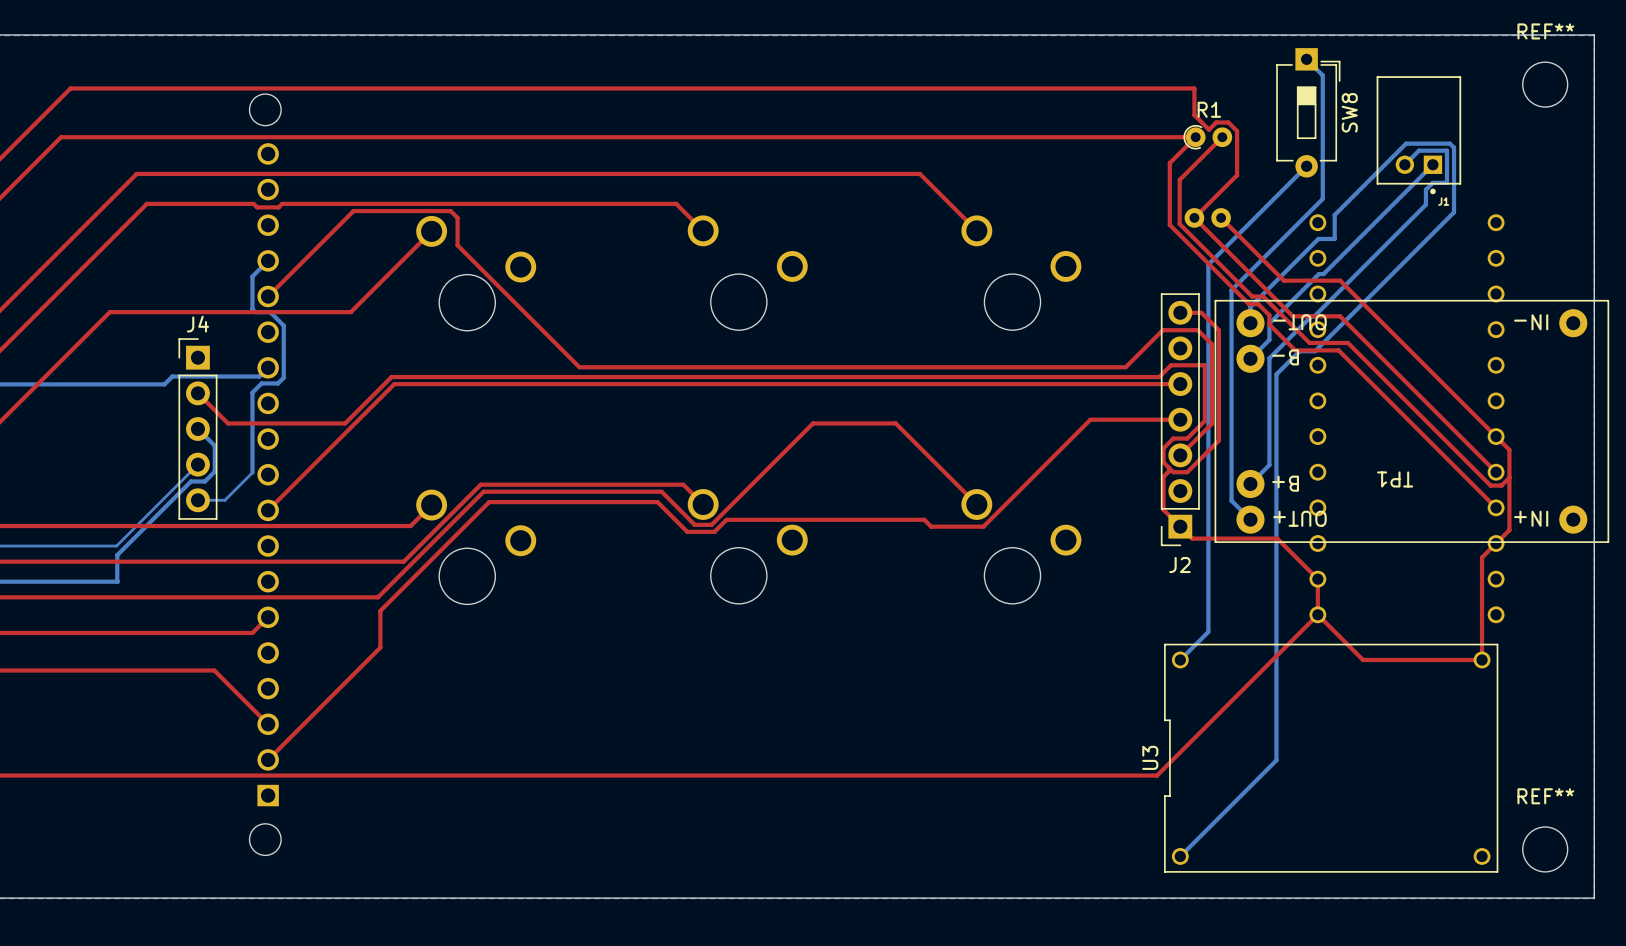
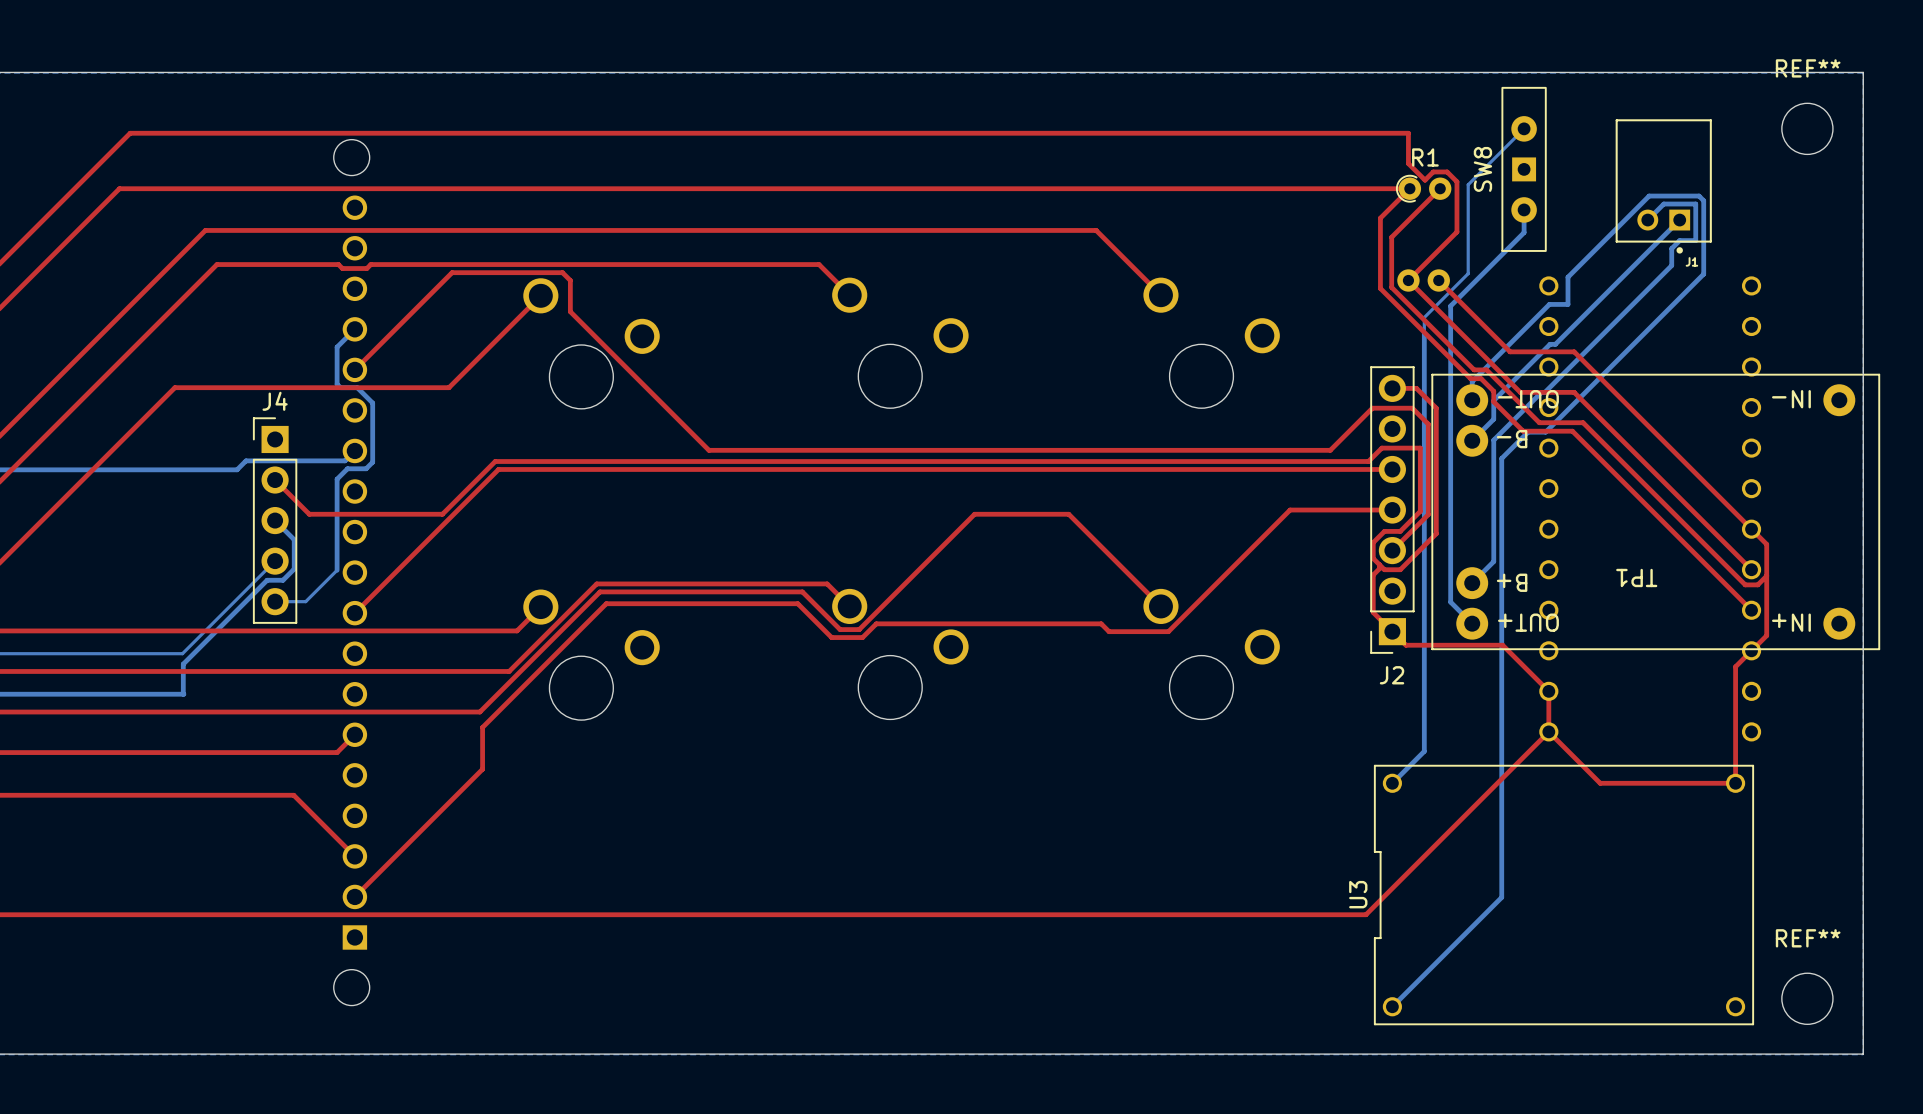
SW8 footprint: [1276, 48, 1341, 178] -> [1501, 86, 1547, 252]
bottom track: (1306, 59) (1322, 75) (1322, 198) (1231, 290) -> (1524, 209) (1524, 232) (1450, 306) (1450, 362)
SW8 name position: SW8 (1349, 112) -> SW8 (1482, 169)
bottom track: (1306, 166) (1208, 264) -> (1524, 128) (1468, 184) (1468, 273) (1424, 317) (1424, 333)

